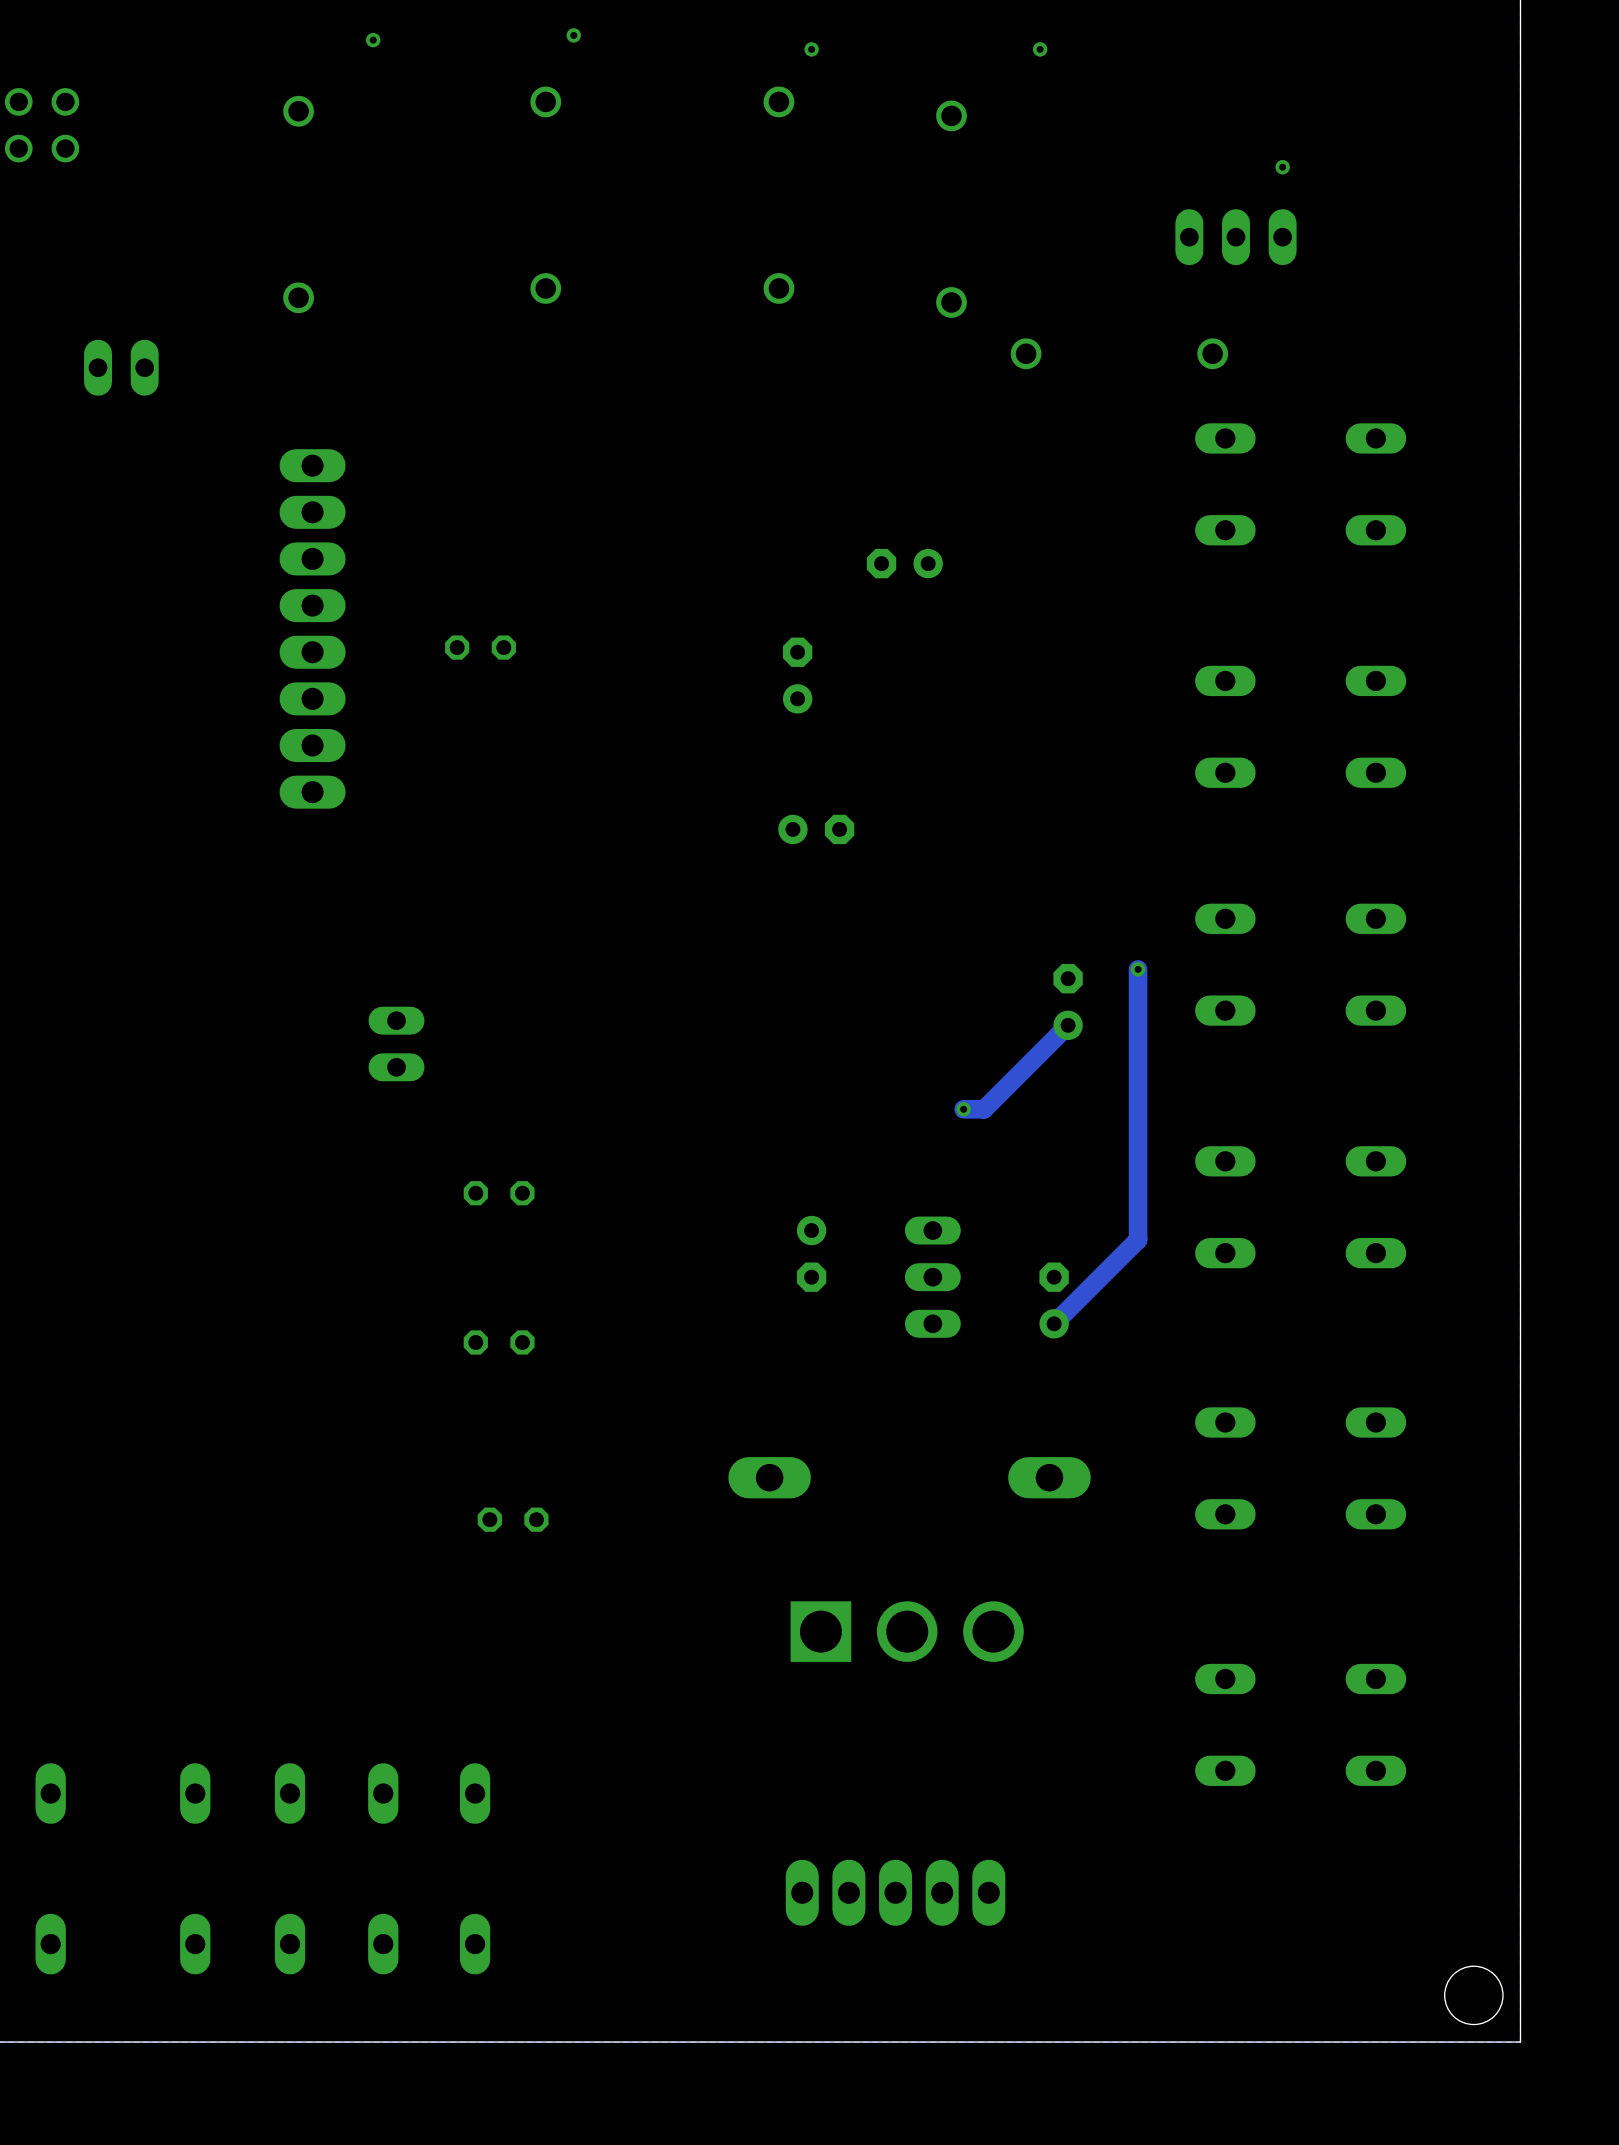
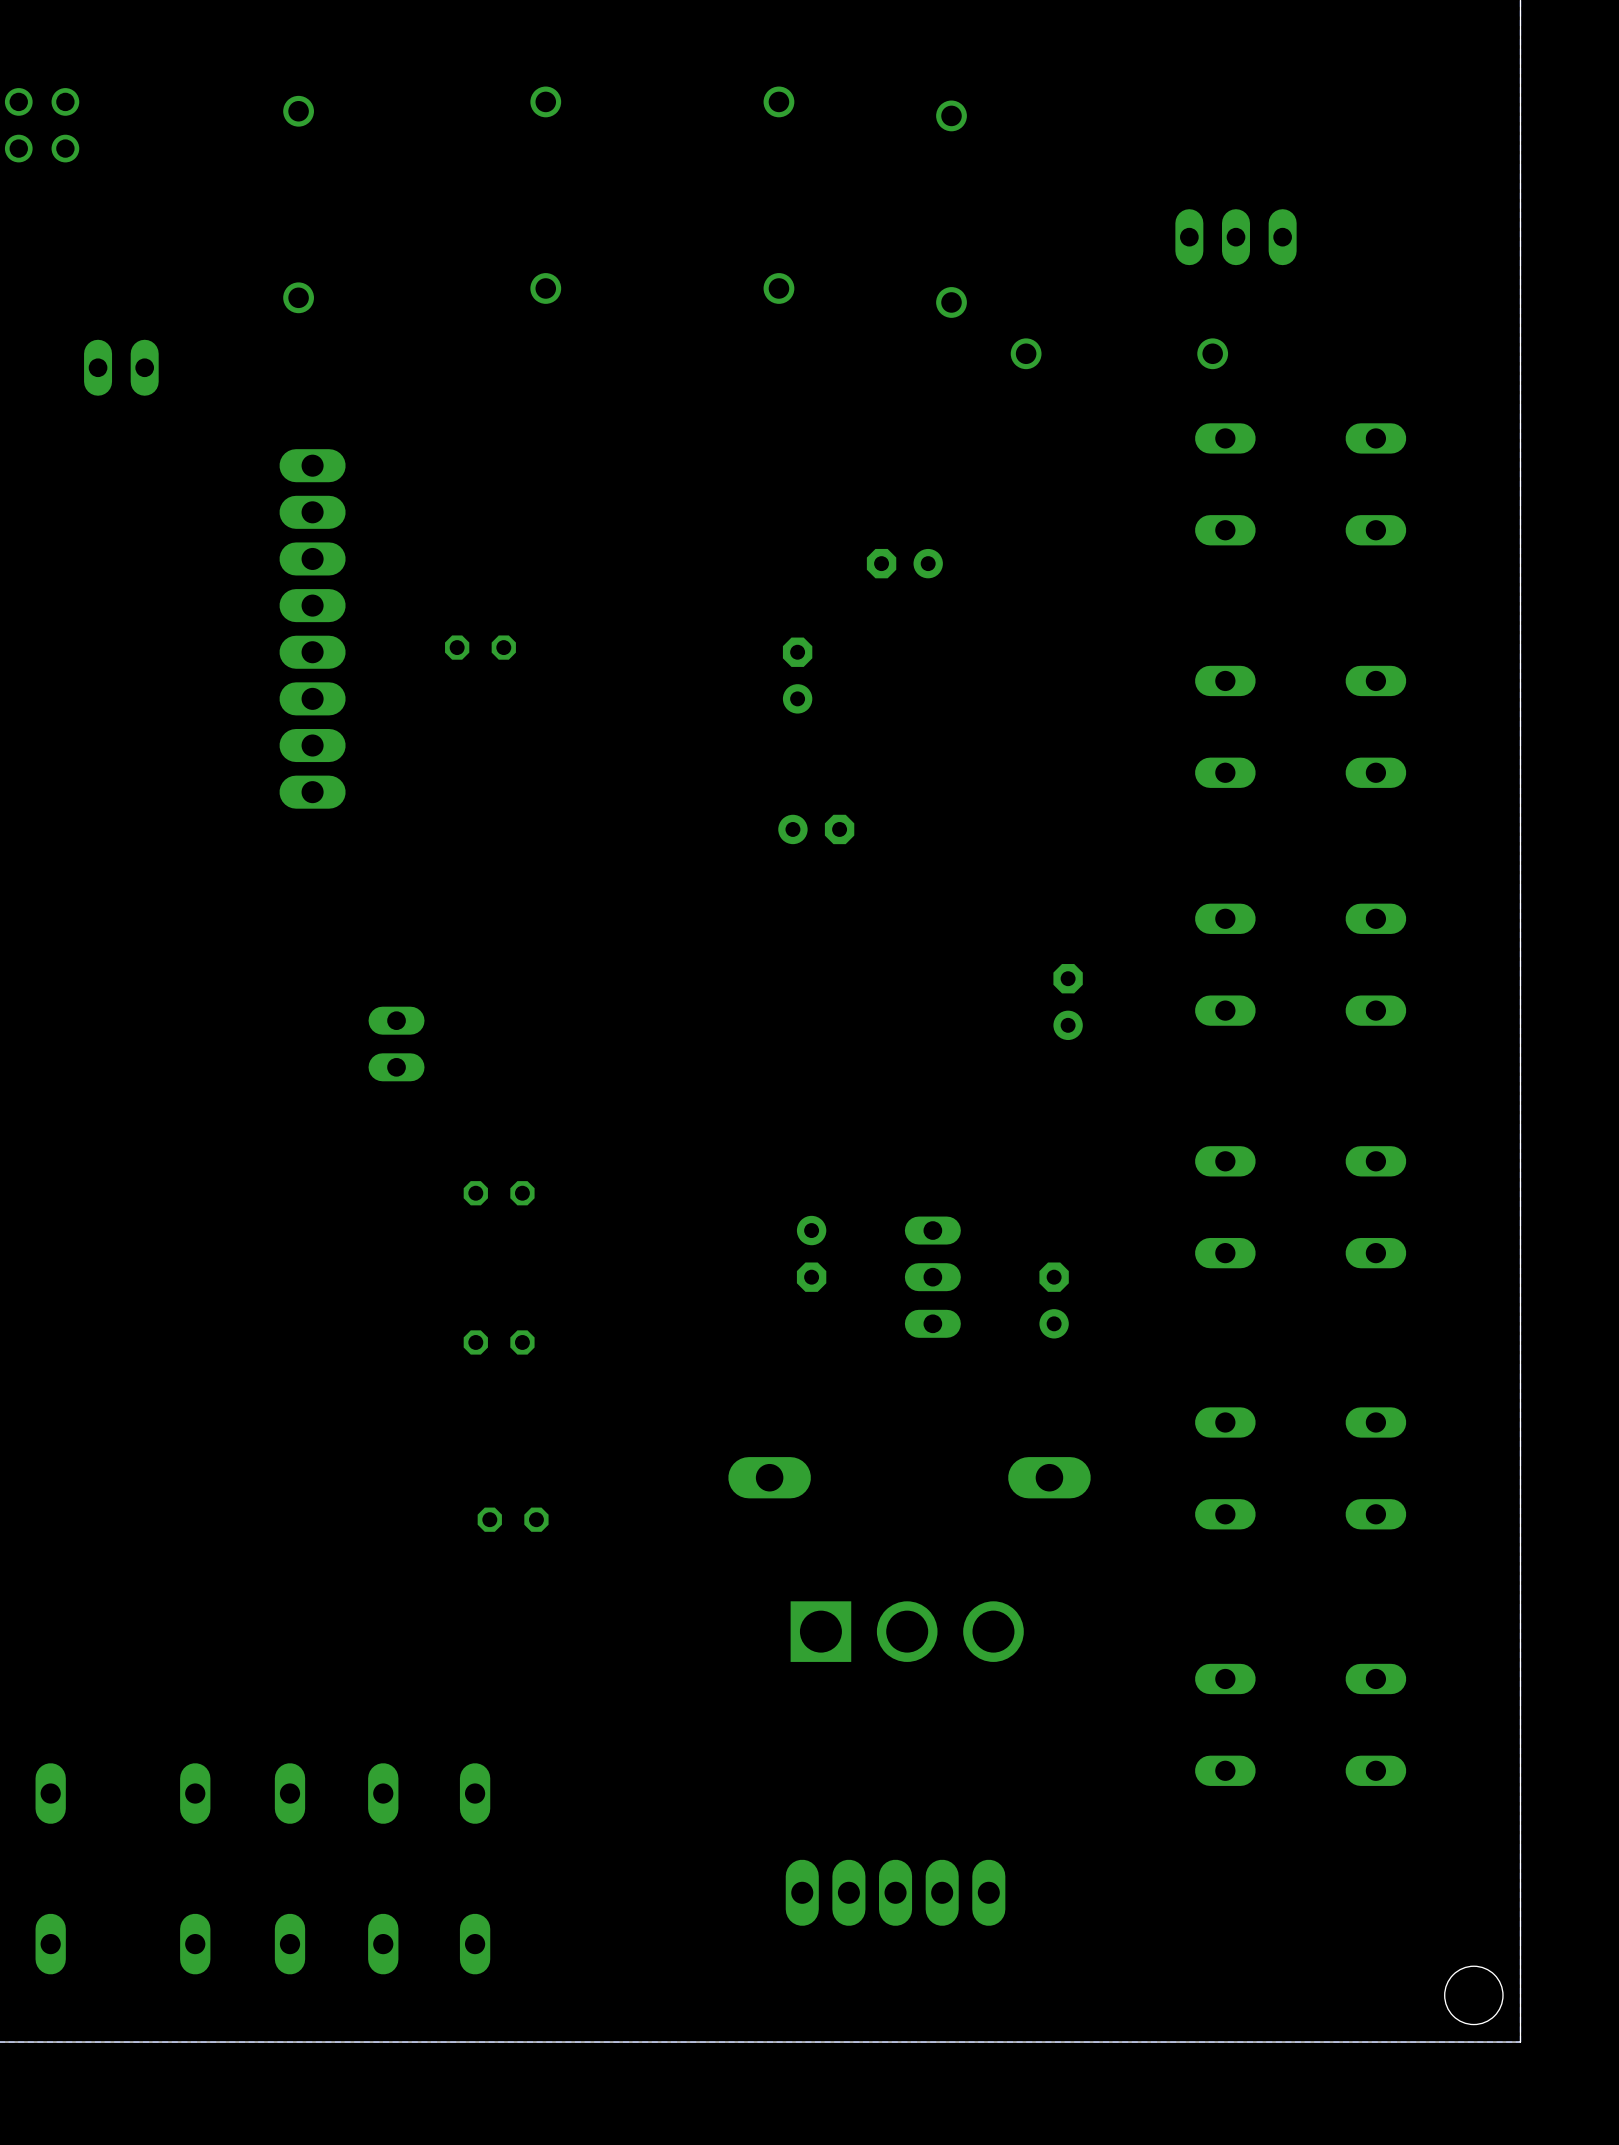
via: (573, 35) -> none
via: (373, 40) -> none
via: (811, 49) -> none
via: (1040, 49) -> none
via: (1282, 167) -> none
track: (1138, 969) (1138, 1239) (1054, 1323) -> none
via: (1138, 969) -> none
track: (1068, 1025) (984, 1109) (963, 1109) -> none
via: (963, 1109) -> none

